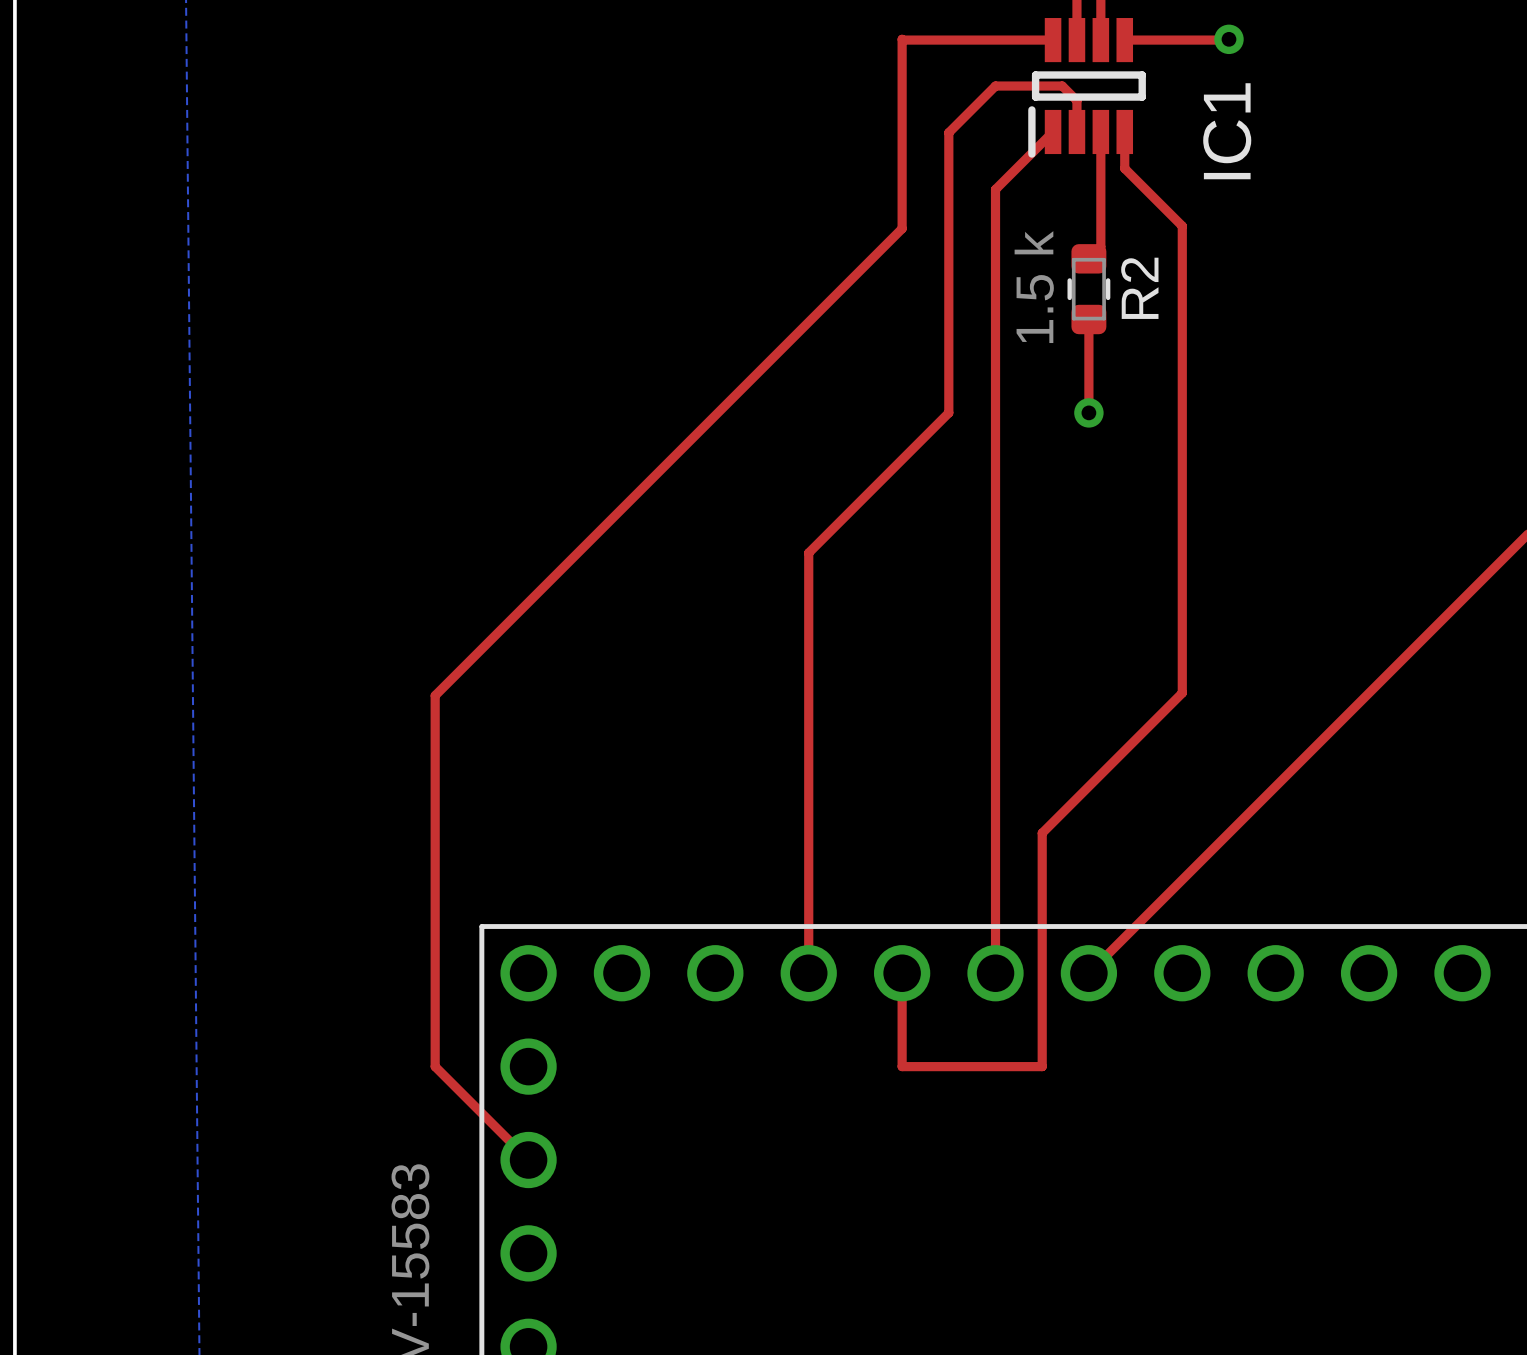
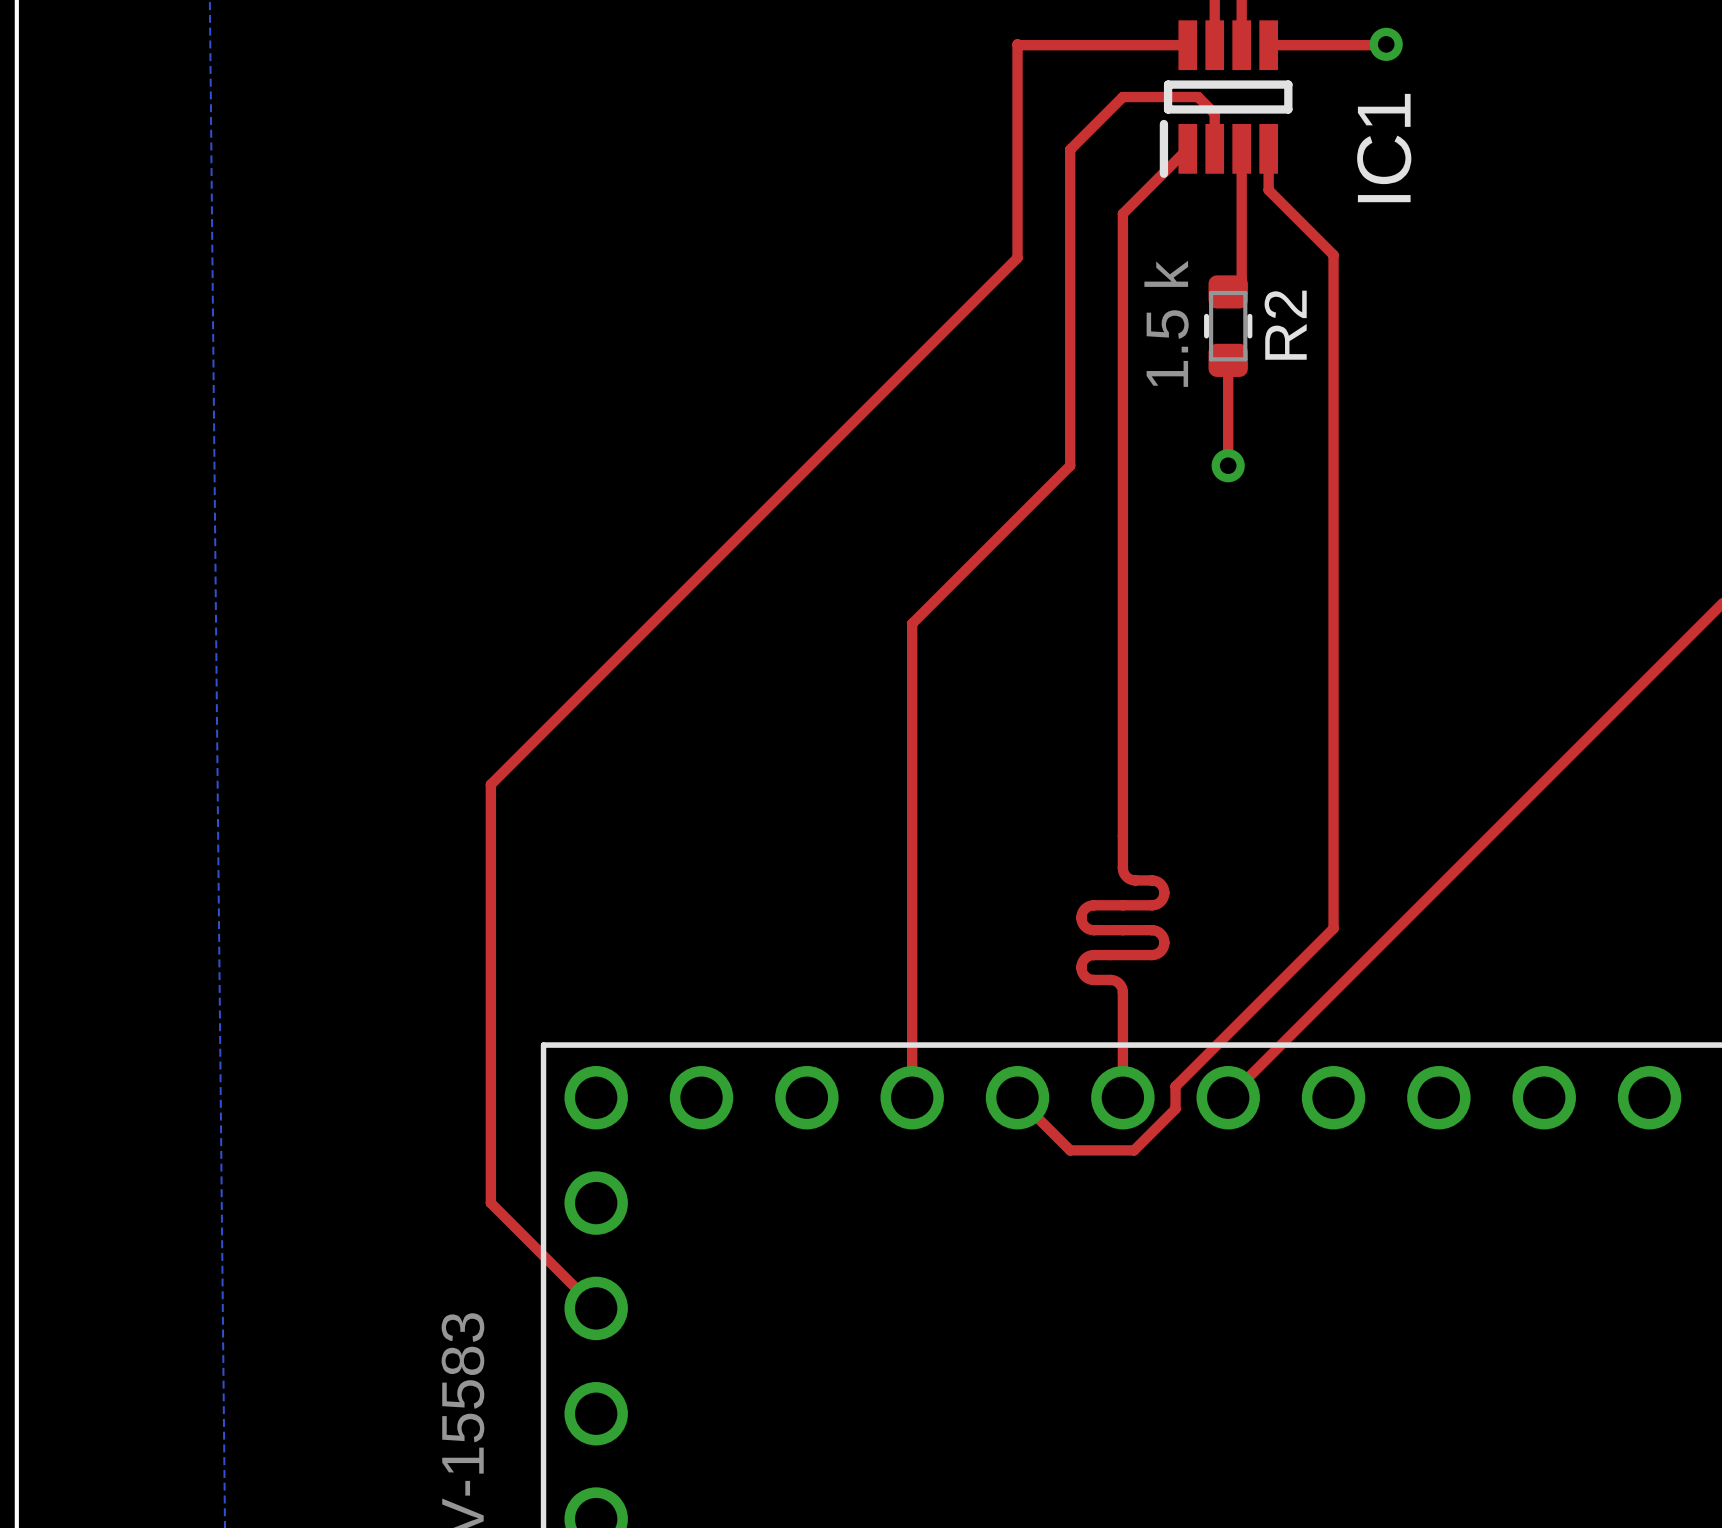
top track: (1182, 693) (1042, 833) (1042, 963) -> (1333, 781) (1333, 928) (1175, 1086)
top track: (995, 769) (995, 879) -> (1122, 867) (1124, 874) (1129, 878) (1156, 881) (1162, 886) (1164, 892) (1161, 900) (1155, 904) (1092, 905) (1086, 907) (1082, 912) (1082, 922) (1090, 929) (1153, 930) (1162, 936) (1163, 947) (1155, 954) (1092, 955) (1083, 959) (1081, 969) (1086, 977) (1092, 979) (1115, 980) (1121, 986) (1122, 992)
top track: (902, 973) (902, 1066) (1042, 1066) (1042, 983) -> (1017, 1097) (1070, 1150) (1134, 1150) (1175, 1108)

